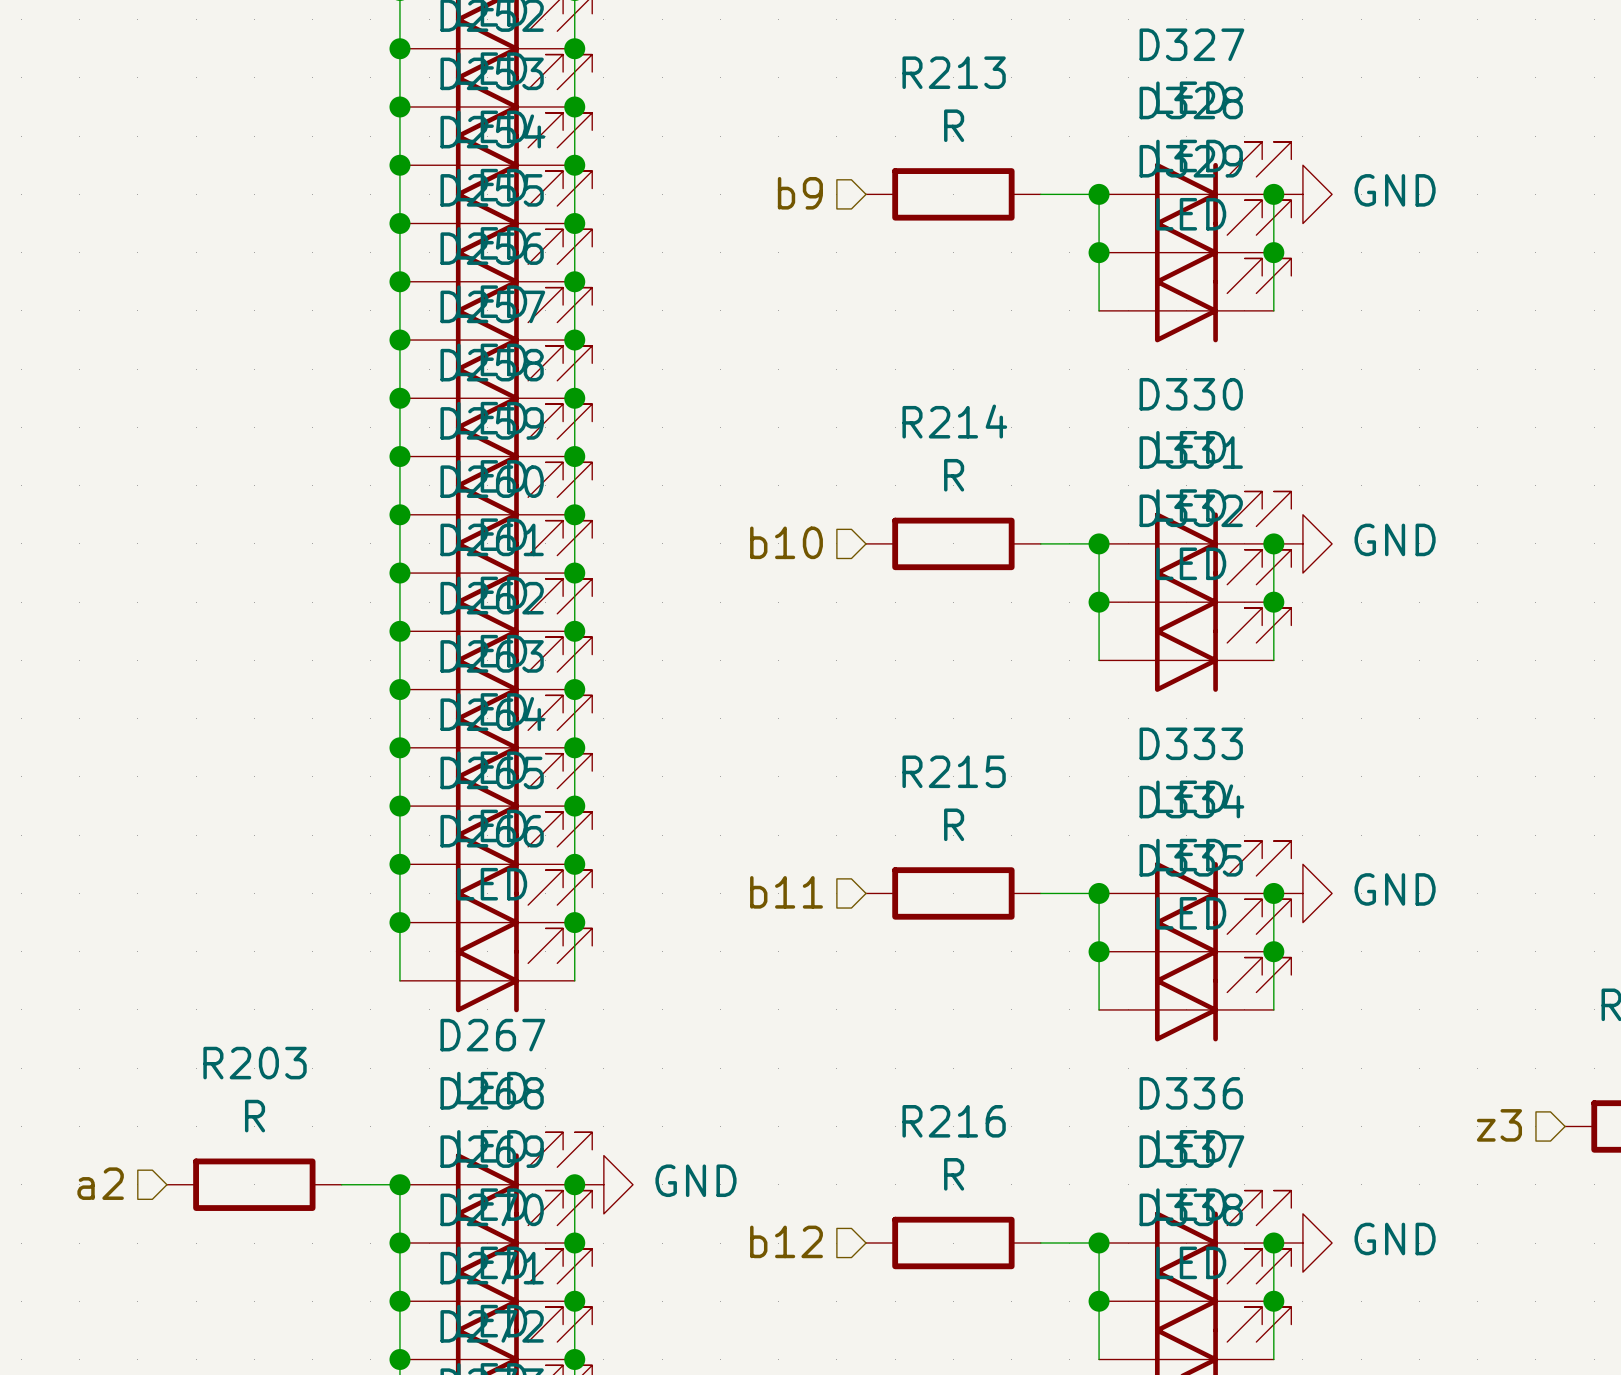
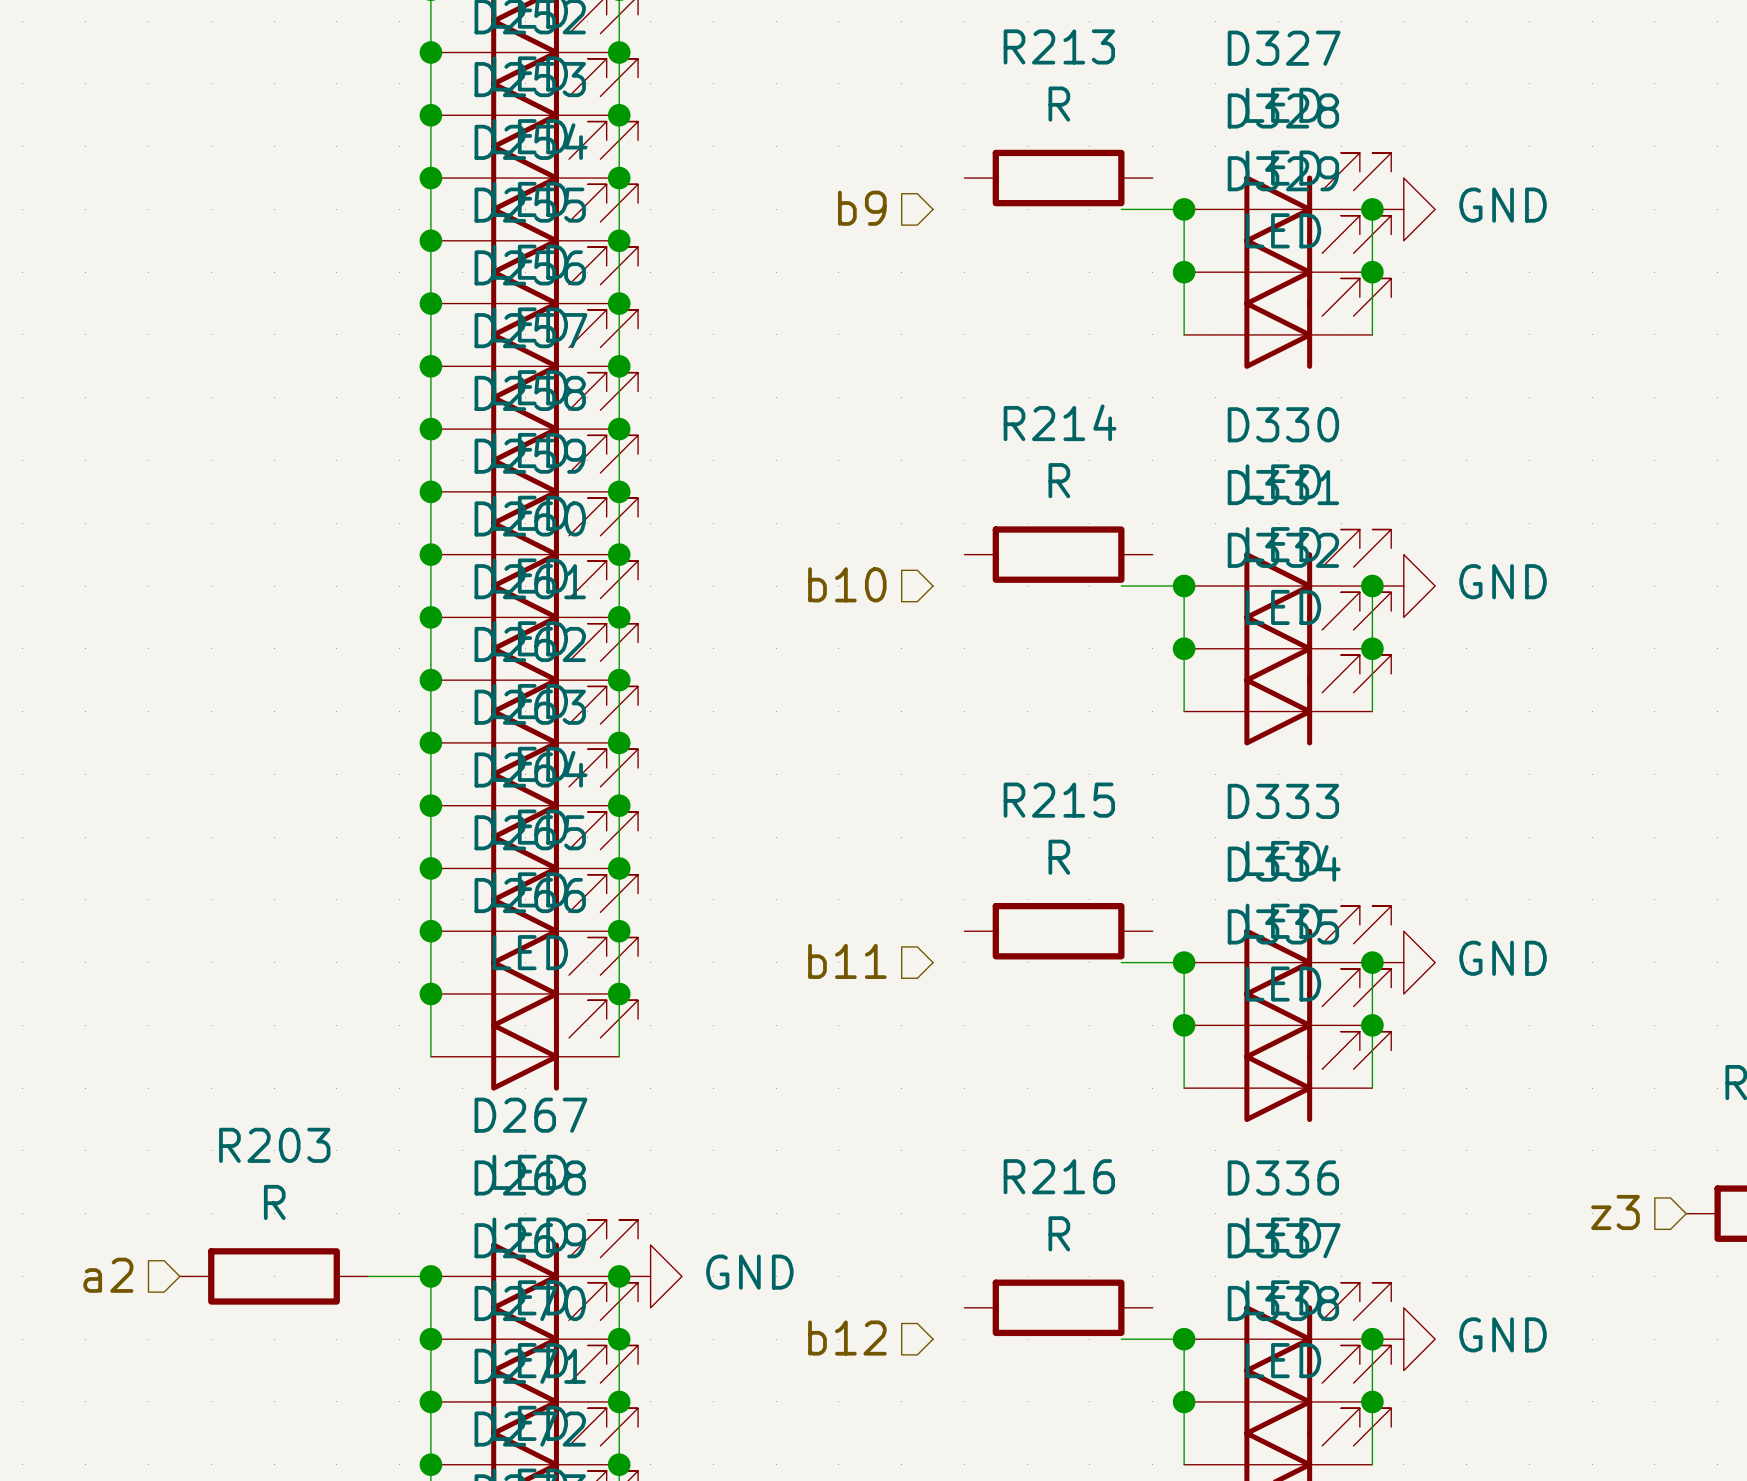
R213 position: (953, 194) -> (1058, 178)
R214 position: (953, 543) -> (1058, 554)
R215 position: (953, 893) -> (1058, 931)
R216 position: (953, 1243) -> (1058, 1307)

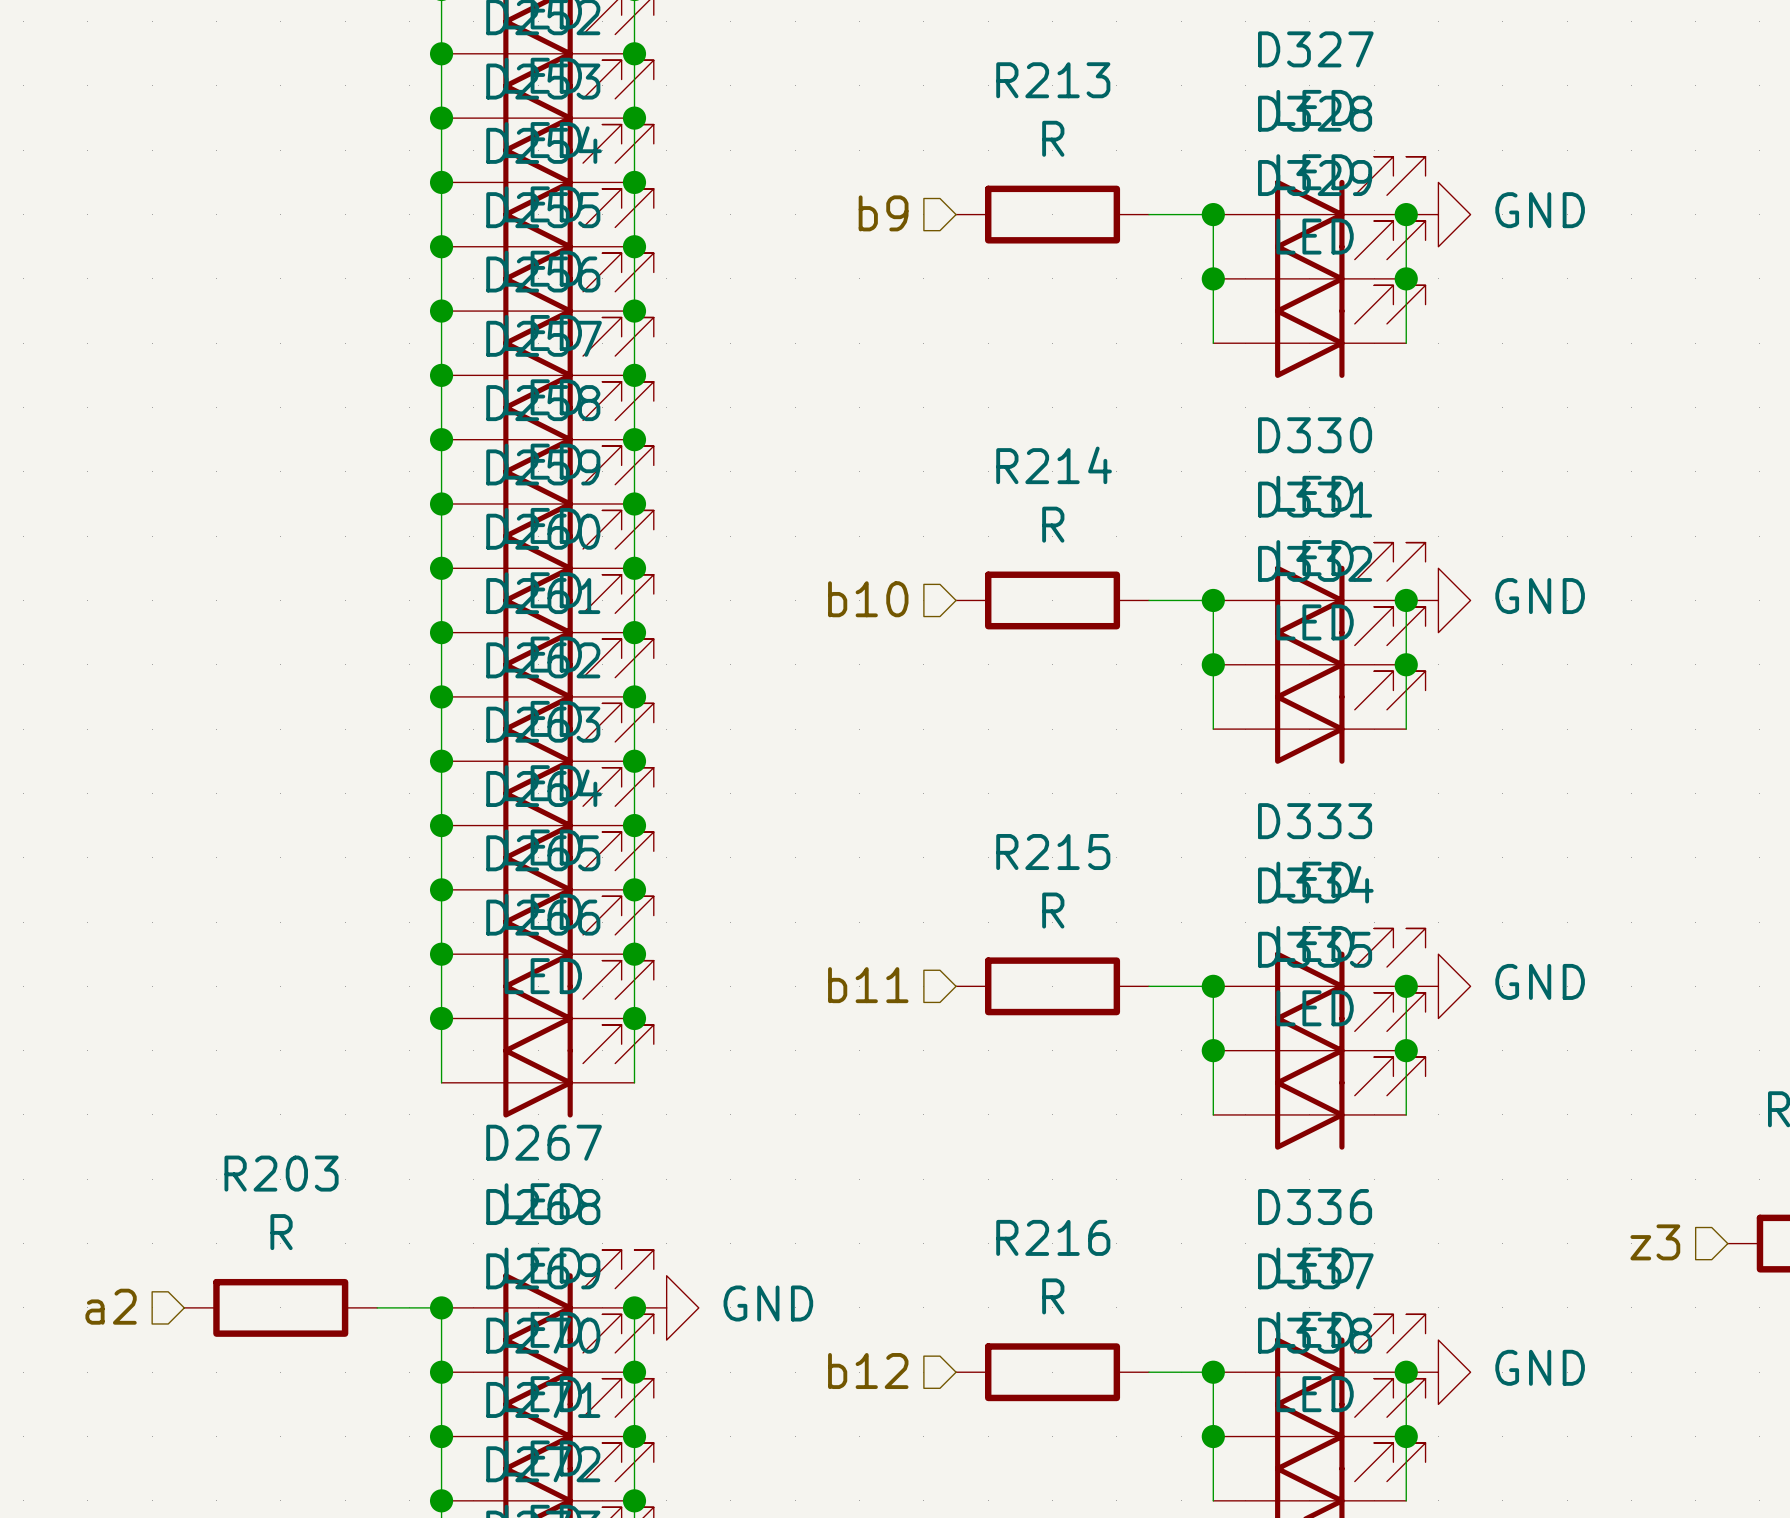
R213 position: (1058, 178) -> (1052, 214)
R214 position: (1058, 554) -> (1052, 600)
R215 position: (1058, 931) -> (1052, 986)
R216 position: (1058, 1307) -> (1052, 1372)

